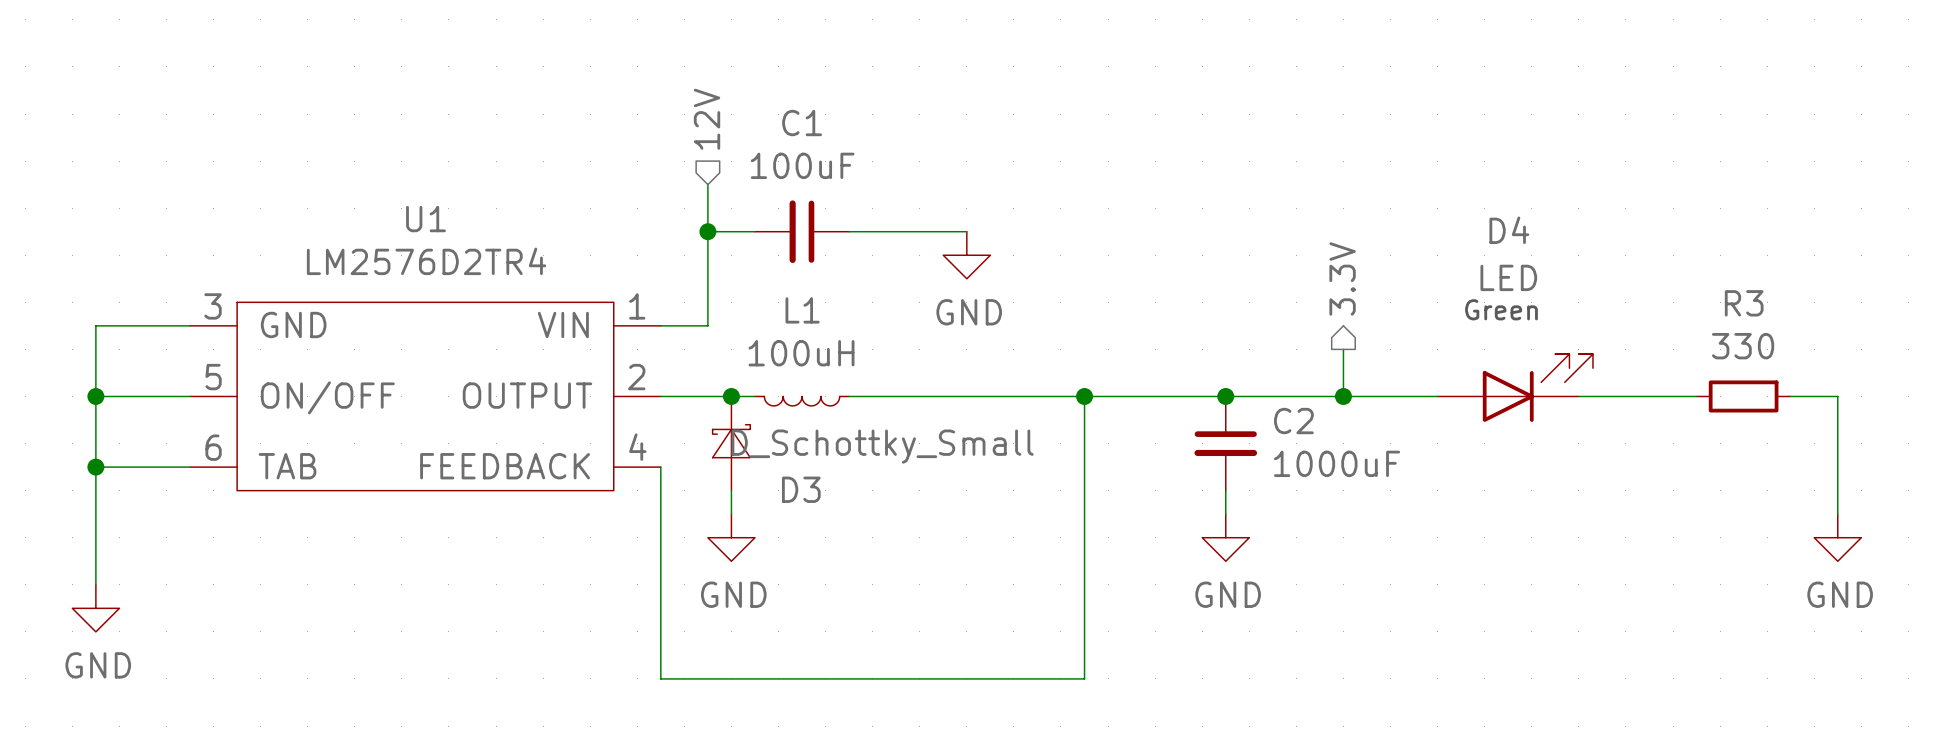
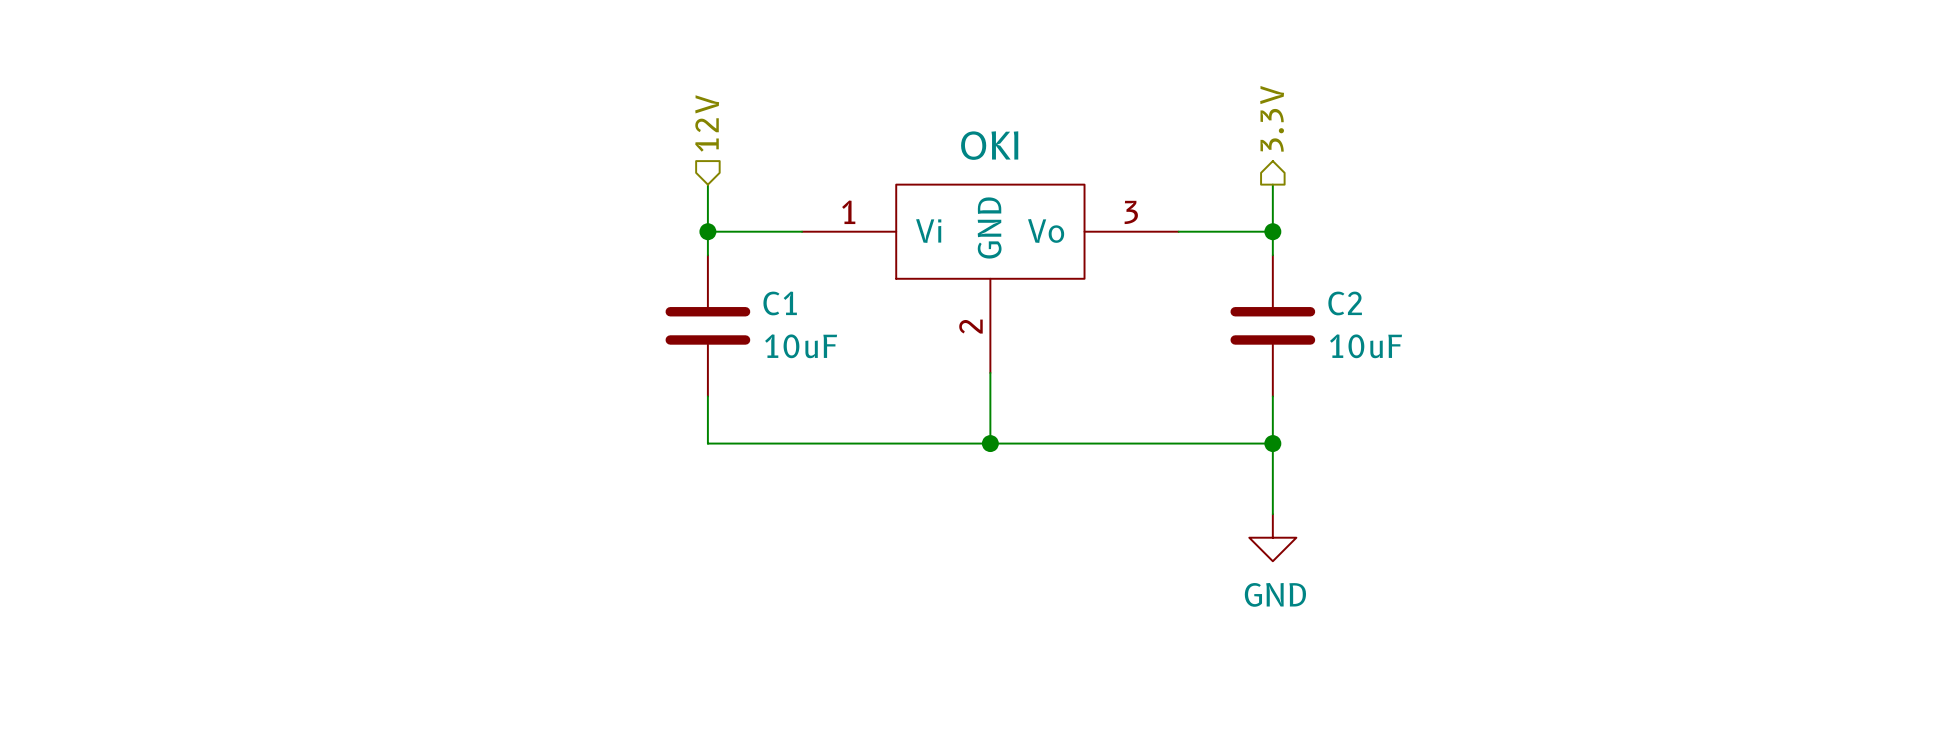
C1 name position: C1 (802, 123) -> C1 (780, 303)
C1 value: 100uF (802, 165) -> 10uF (801, 346)
wire: none -> (1272, 184) (1272, 255)
C1 symbol: [754, 200, 850, 264] -> [665, 255, 751, 397]
wire: (849, 231) (966, 231) -> none
wire: none -> (1178, 231) (1272, 231)
junction: none -> (1272, 231)
wire: (707, 255) (707, 325) (660, 325) -> none
power symbol: GND (966, 255) -> none
part: none -> OKI (990, 278)
hierarchical label position: 3.3V (1342, 278) -> 3.3V (1272, 118)
text: Green (1501, 309) -> none
wire: (190, 325) (95, 325) (95, 584) -> none
wire: (1343, 349) (1343, 396) -> none
wire: none -> (990, 372) (990, 443)
D4: LED (1515, 388) -> none
wire: (95, 396) (190, 396) -> none
junction: (95, 396) -> none
U1: LM2576D2TR4 (425, 396) -> none
wire: (660, 396) (754, 396) -> none
wire: none -> (707, 396) (707, 443) (1272, 443)
junction: (731, 396) -> none
wire: (849, 396) (1437, 396) -> none
wire: (1084, 396) (1084, 678) (660, 678) (660, 467) -> none
junction: (1084, 396) -> none
C2 symbol: [1194, 396, 1258, 491] -> [1230, 255, 1316, 397]
junction: (1225, 396) -> none
wire: none -> (1272, 396) (1272, 514)
junction: (1343, 396) -> none
wire: (1578, 396) (1696, 396) -> none
R3: 330 (1743, 396) -> none
wire: (1790, 396) (1837, 396) (1837, 514) -> none
L1: 100uH (802, 401) -> none
D3: D_Schottky_Small (731, 443) -> none
junction: none -> (990, 443)
junction: none -> (1272, 443)
C2 value: 1000uF (1337, 463) -> 10uF (1366, 346)
wire: (95, 467) (190, 467) -> none
junction: (95, 467) -> none
wire: (731, 490) (731, 514) -> none
wire: (1225, 490) (1225, 514) -> none
power symbol: GND (731, 537) -> none
power symbol position: GND (1225, 537) -> GND (1272, 537)
power symbol: GND (1837, 537) -> none
power symbol: GND (95, 608) -> none

